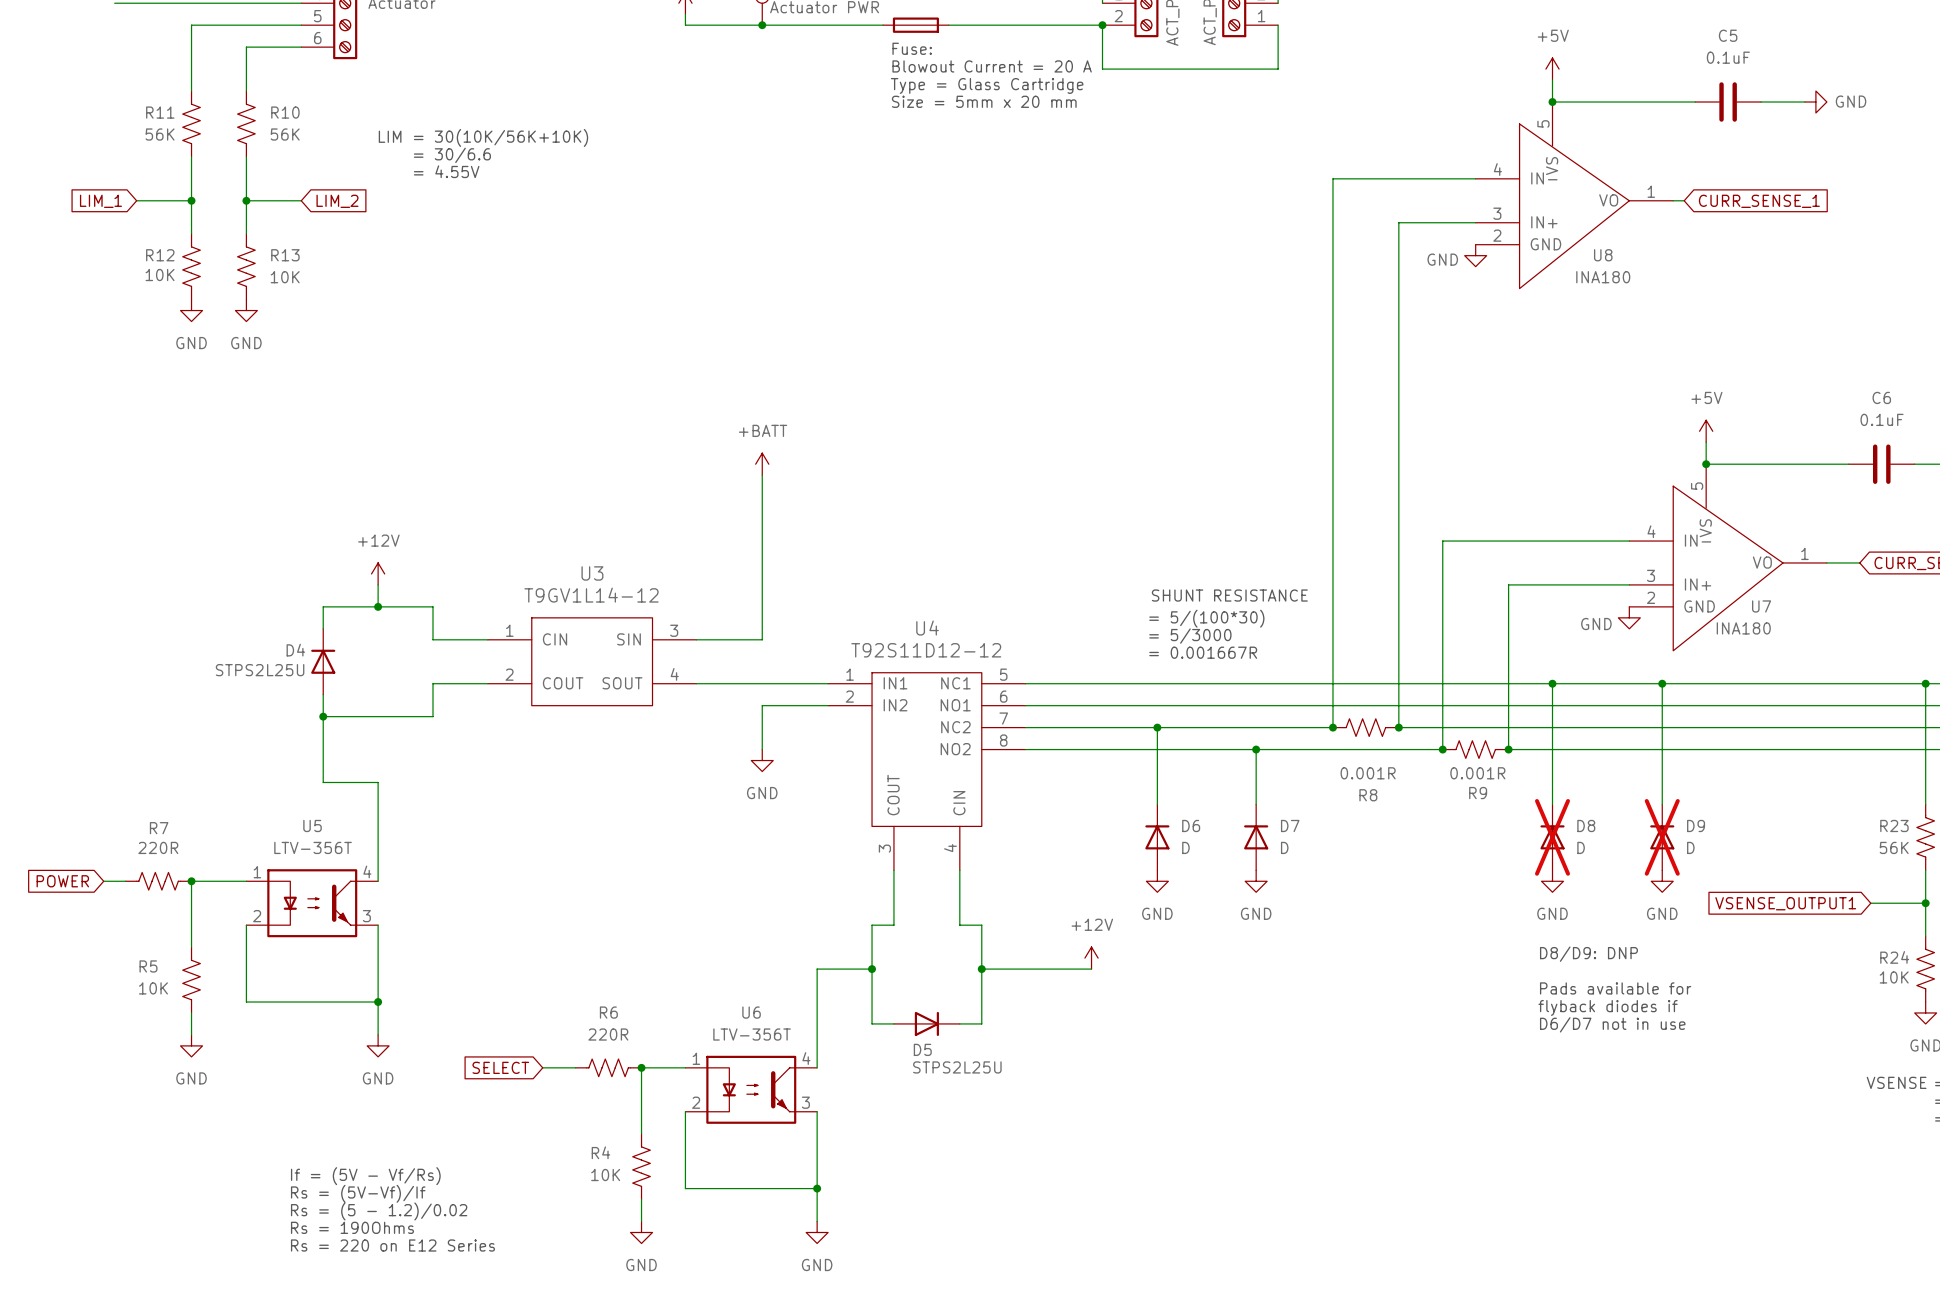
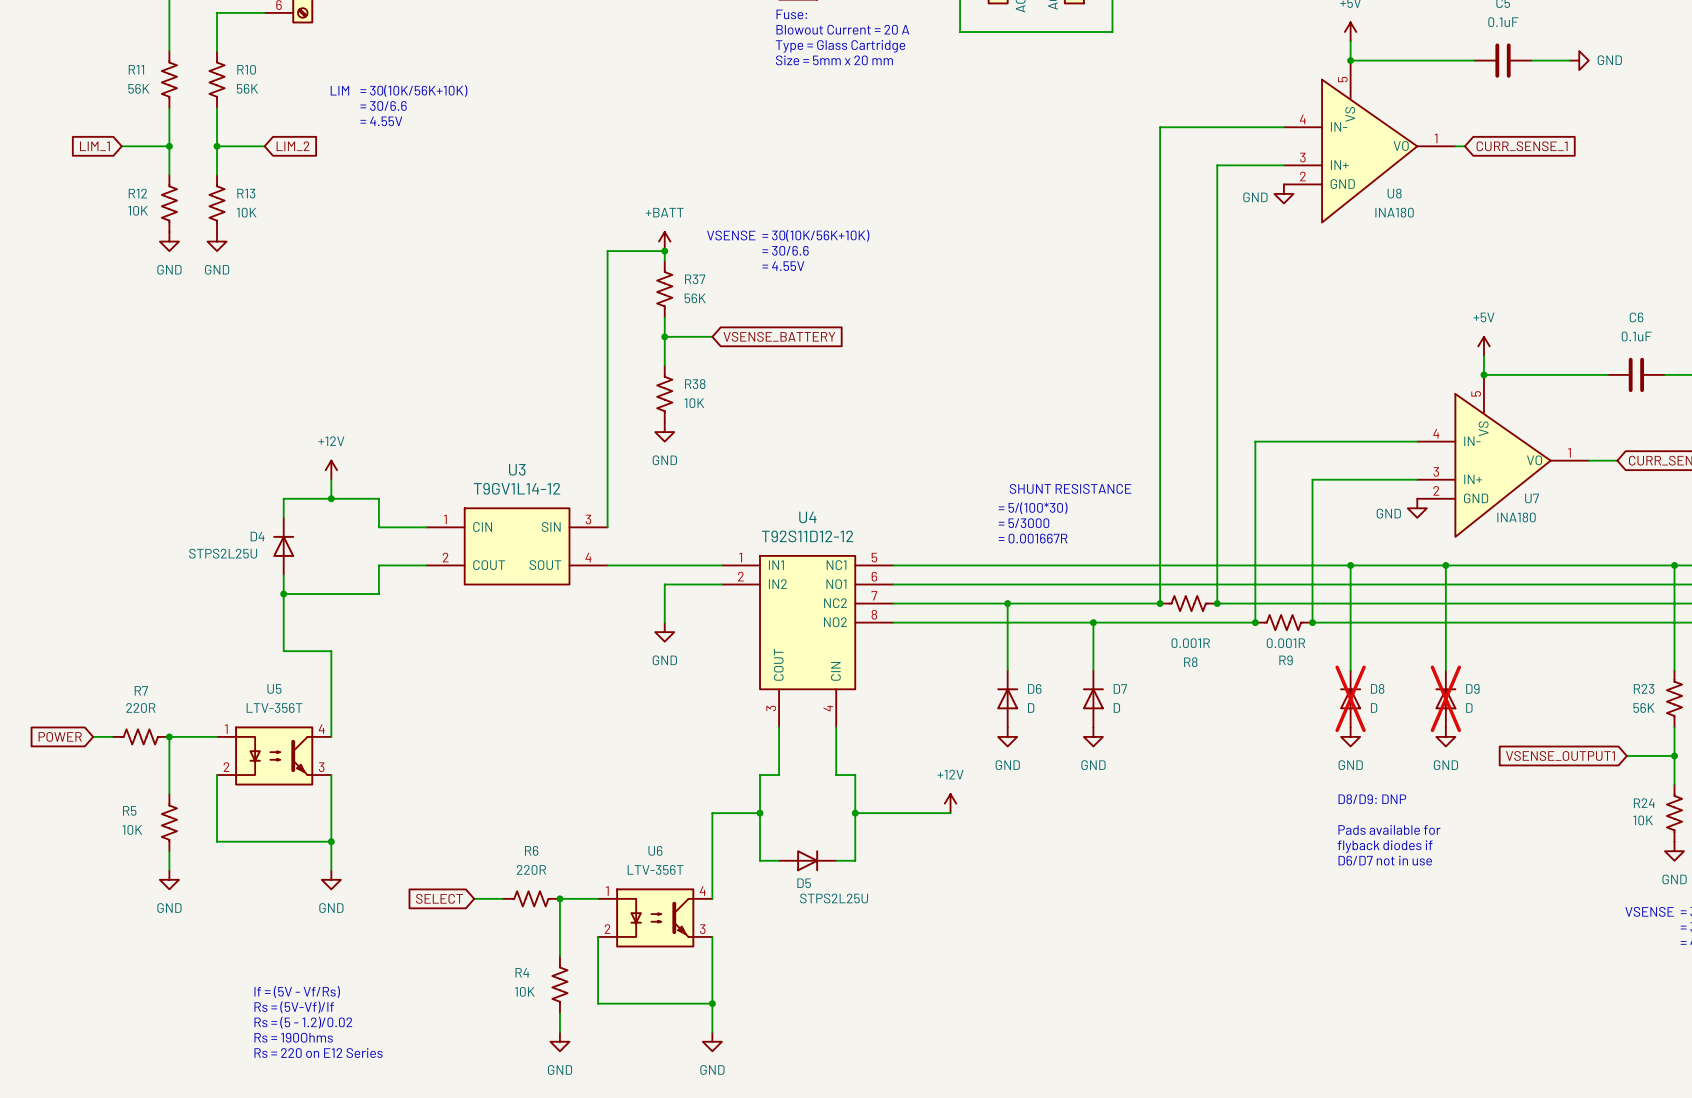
text: none -> VSENSE (731, 235)
text: none -> = 30(10K/56K+10K) (815, 235)
junction: none -> (664, 251)
text: none -> = 30/6.6 (785, 250)
text: none -> = 4.55V (783, 266)
R37: none -> 56K (664, 289)
wire: none -> (664, 317) (664, 365)
wire: none -> (664, 336) (712, 336)
junction: none -> (664, 336)
global label: none -> VSENSE_BATTERY (779, 336)
power symbol position: +BATT (762, 464) -> +BATT (664, 241)
wire: (762, 475) (762, 639) (696, 639) -> (664, 260) (664, 251) (607, 251) (607, 527)
R38: none -> 10K (664, 393)
power symbol: none -> GND (664, 432)

